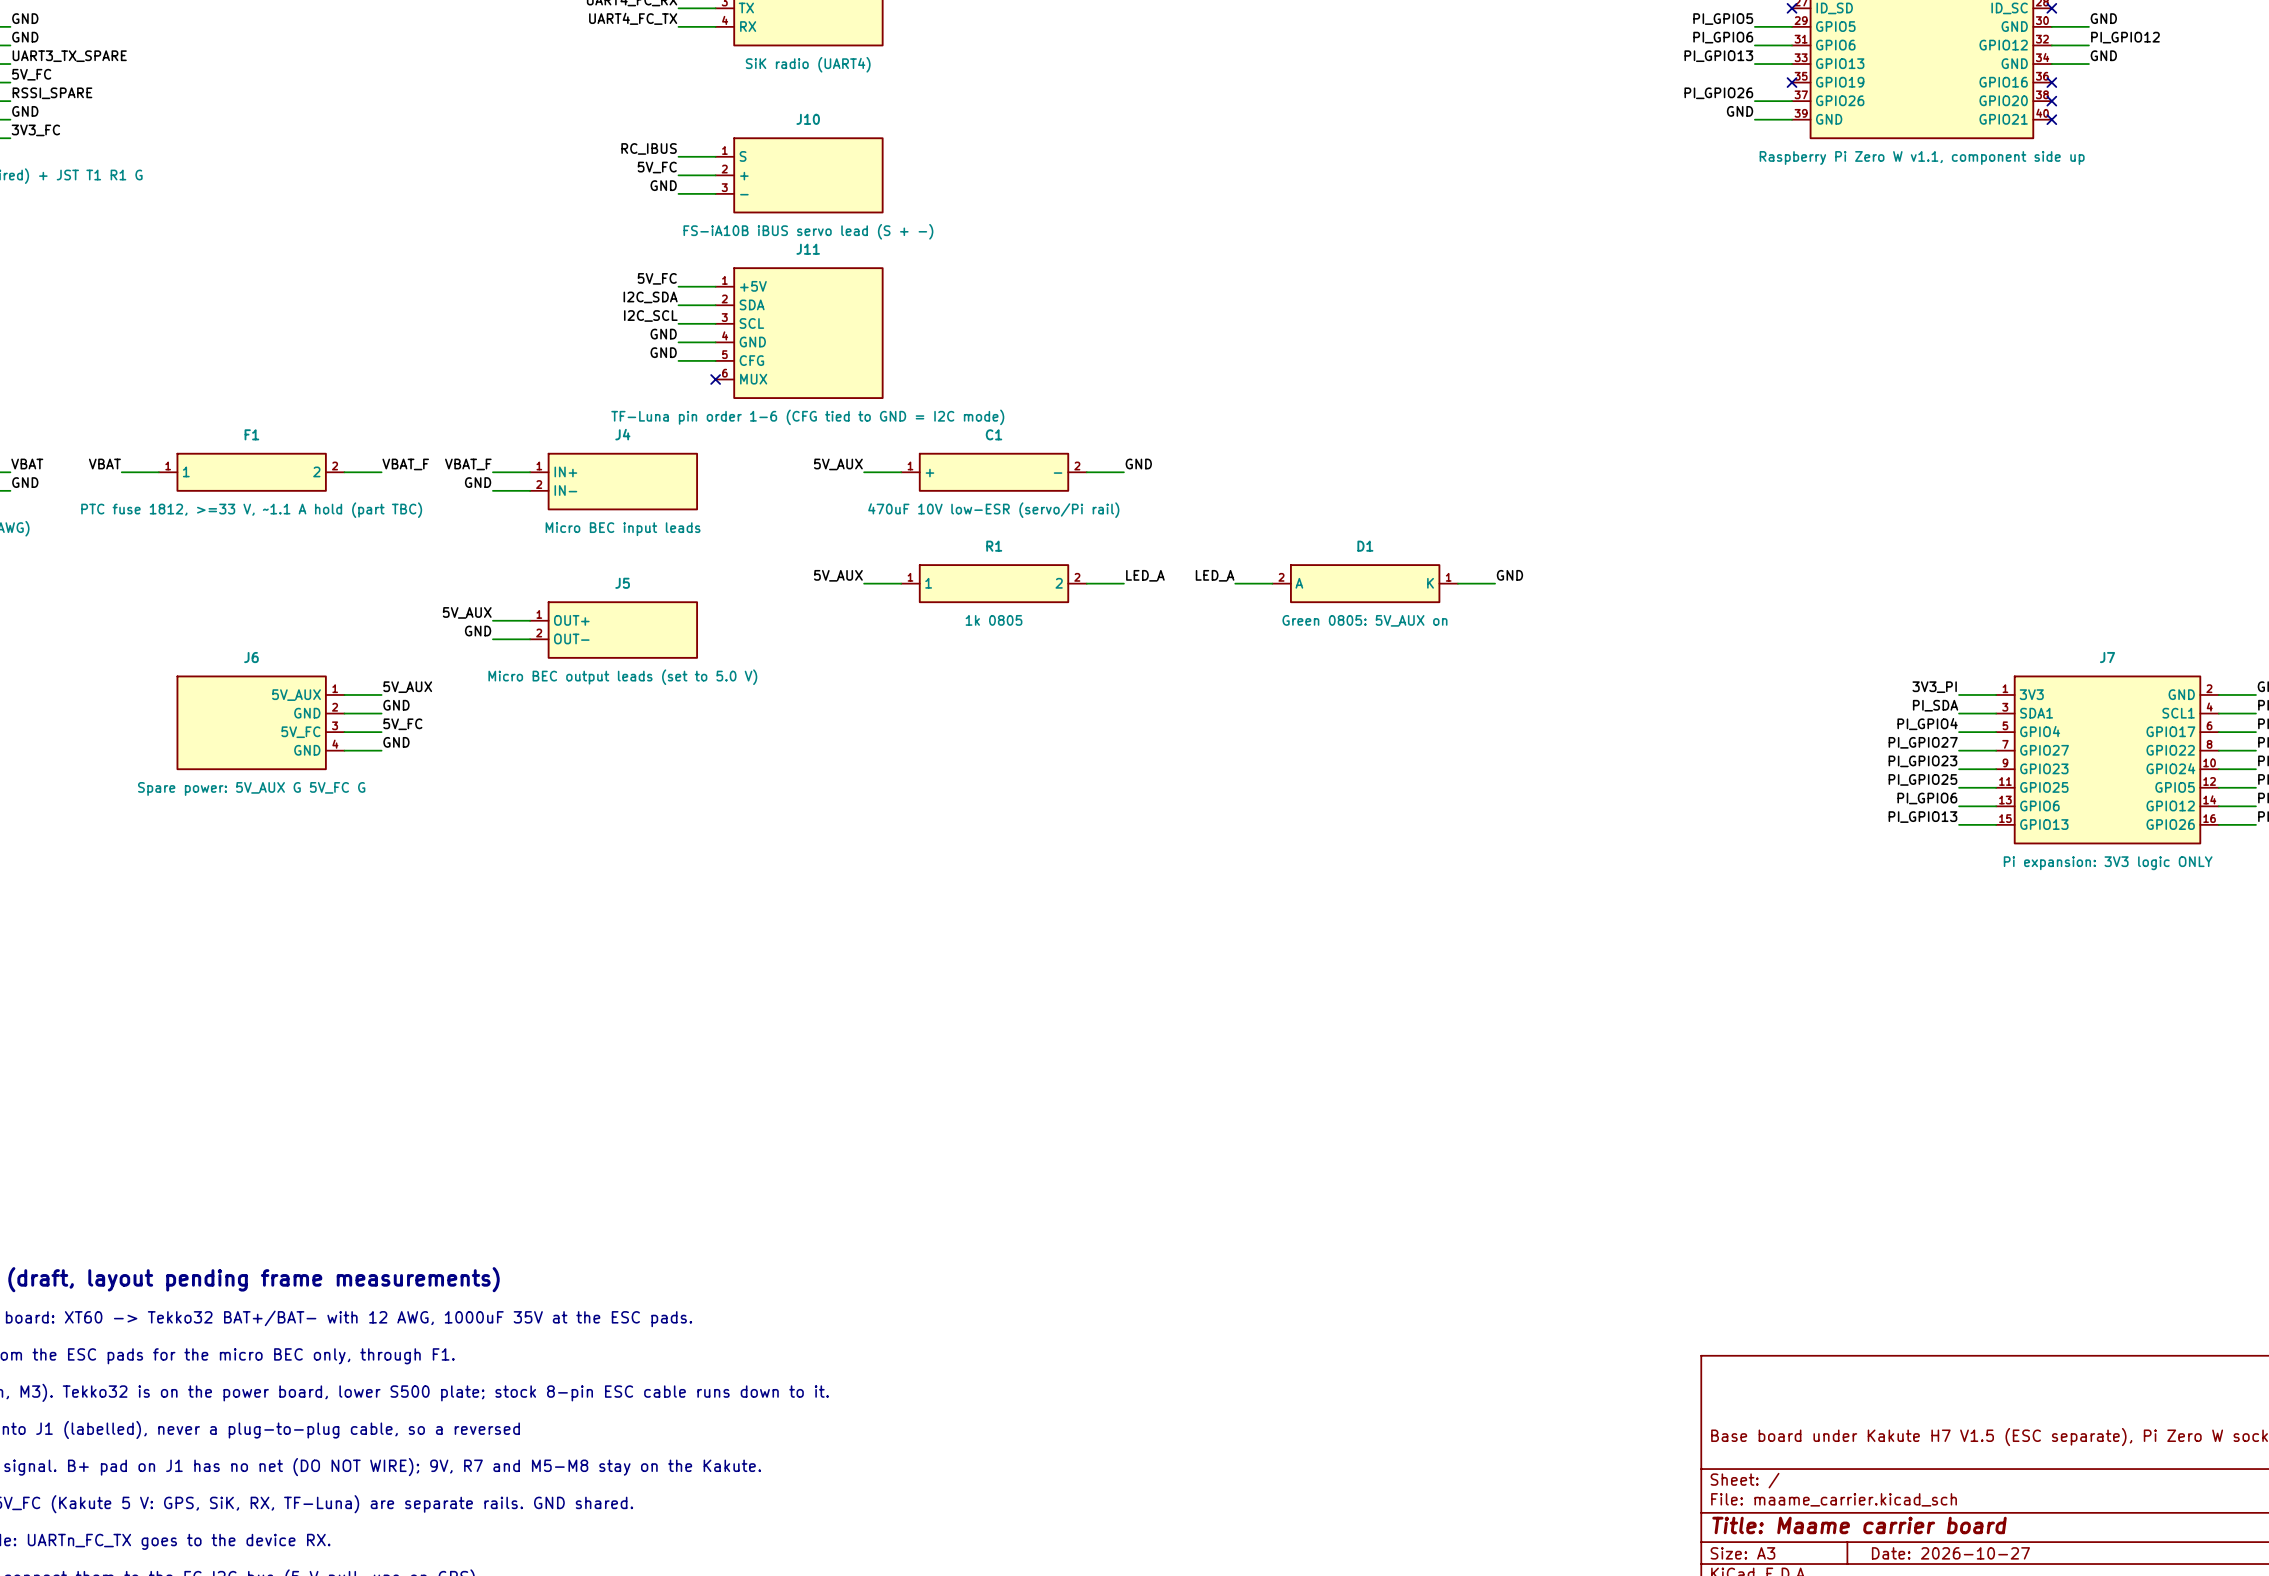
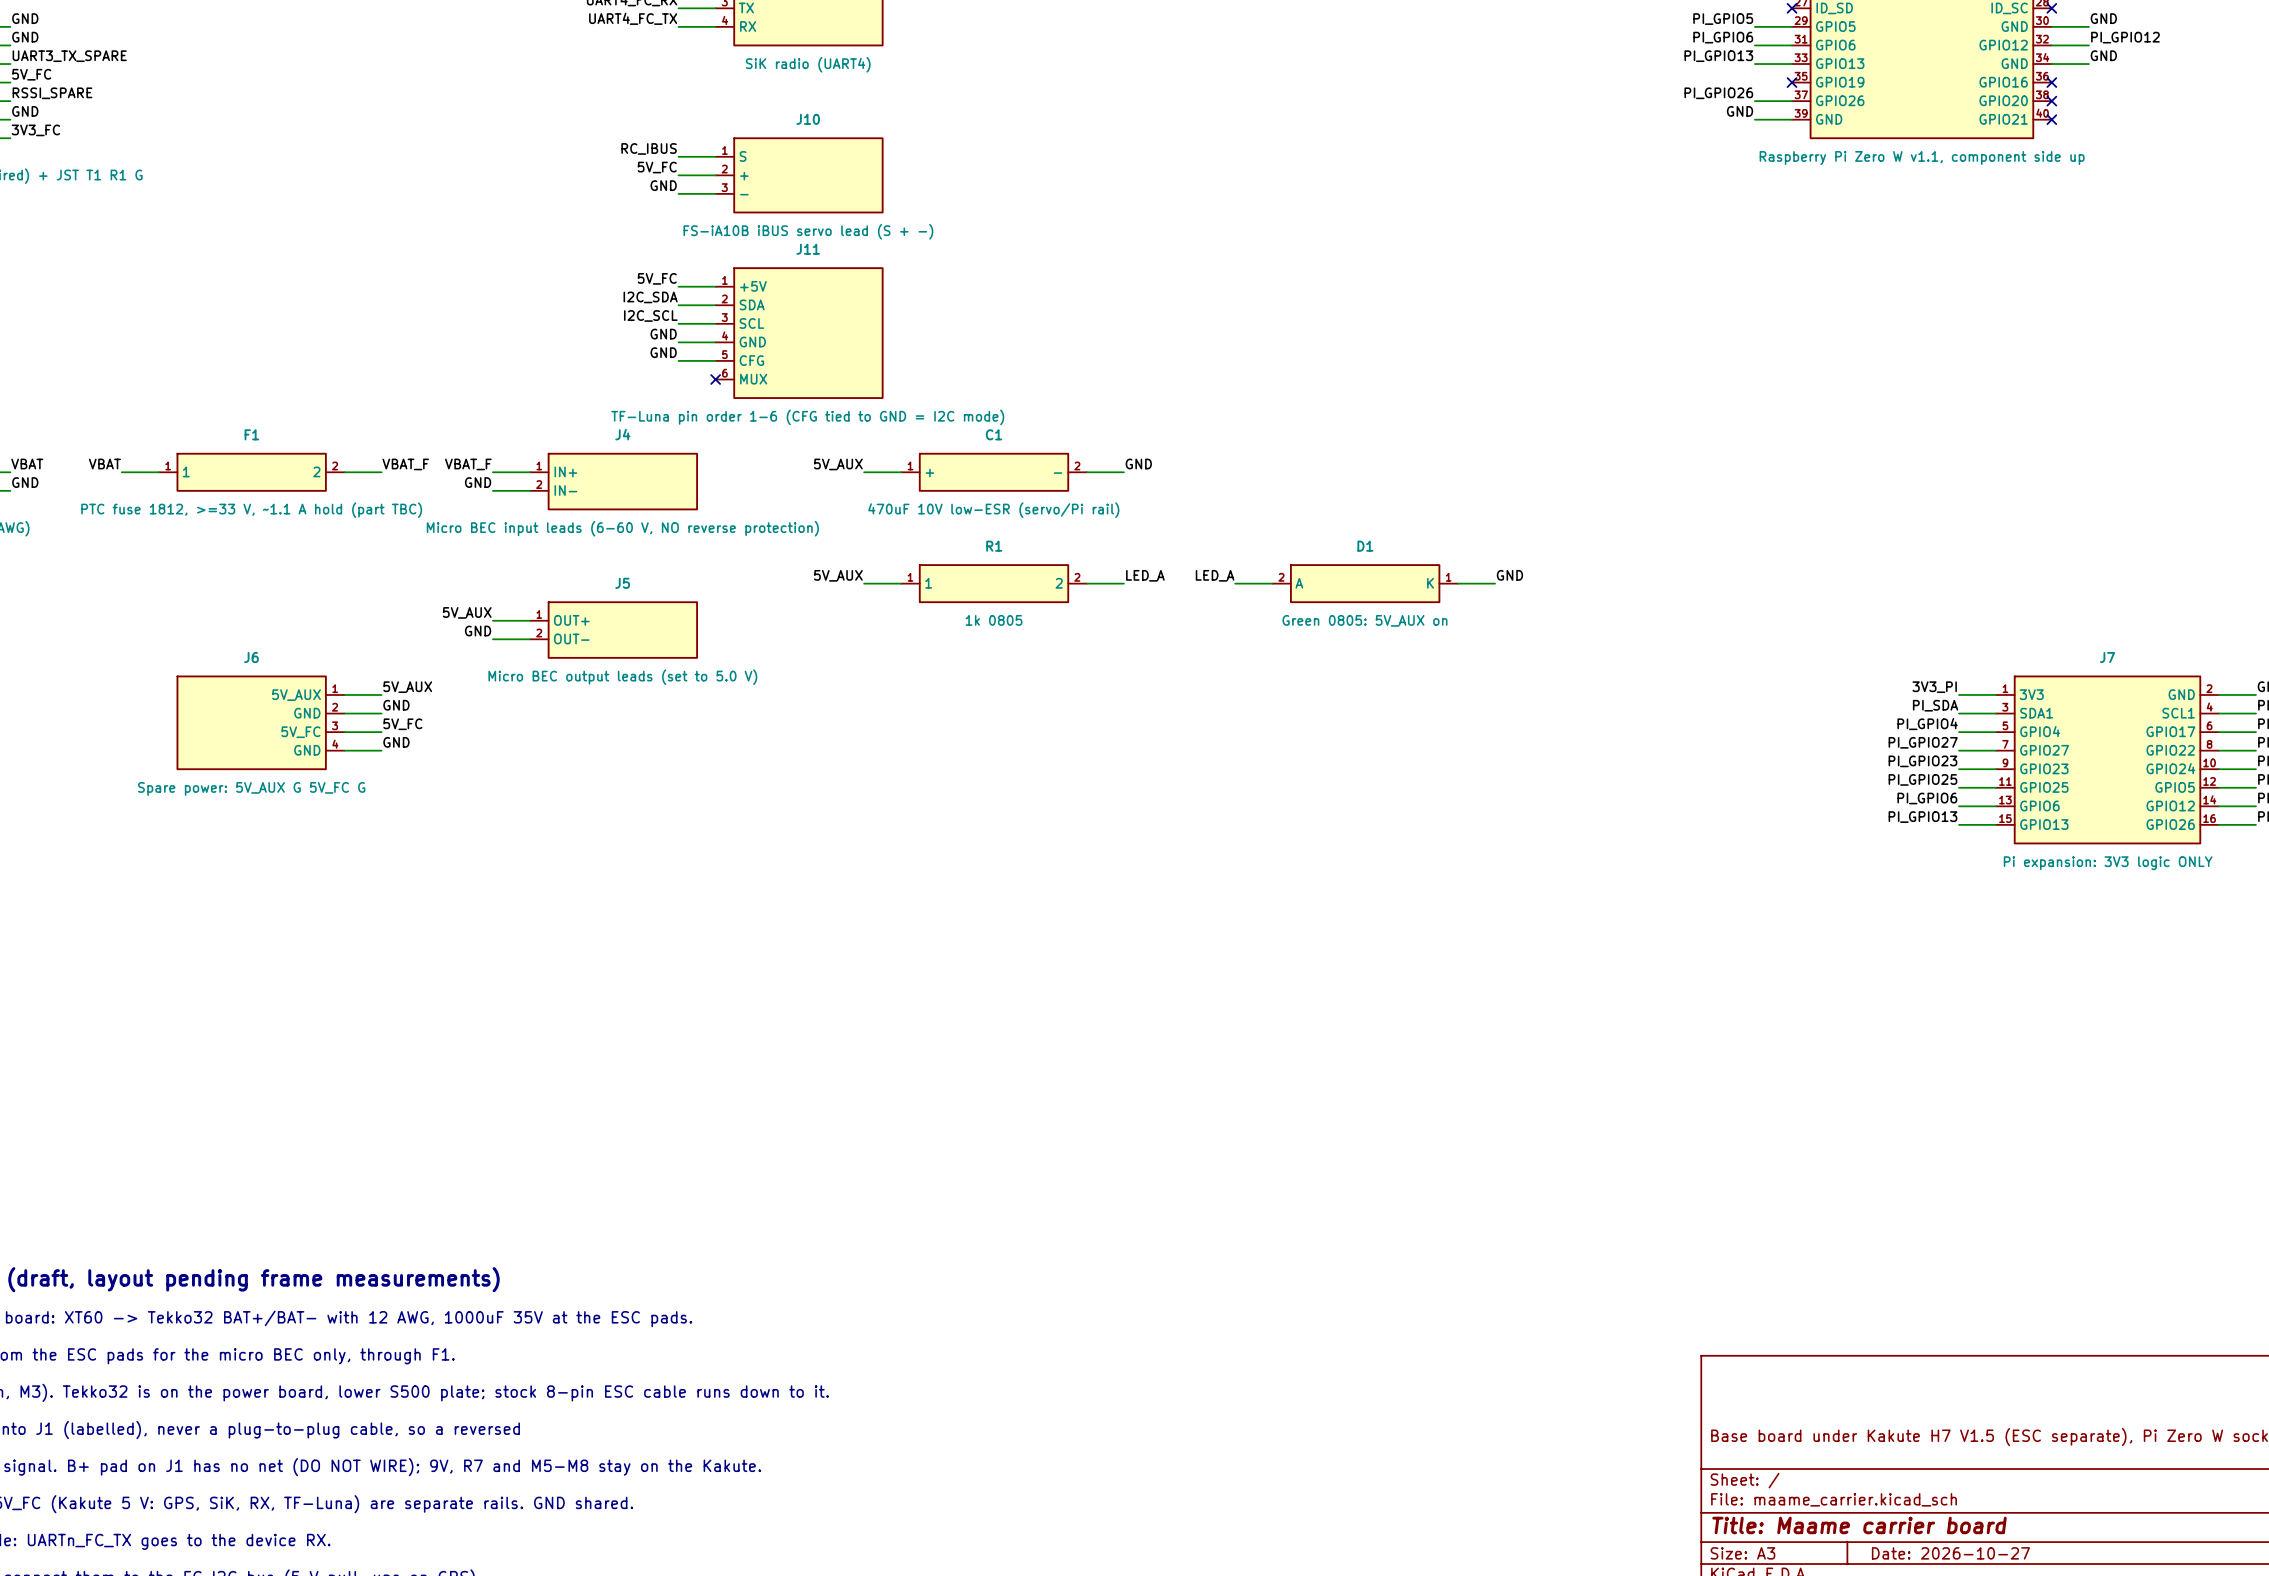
J4 value: Micro BEC input leads (623, 529) -> Micro BEC input leads (6-60 V, NO reverse protection) (622, 528)

